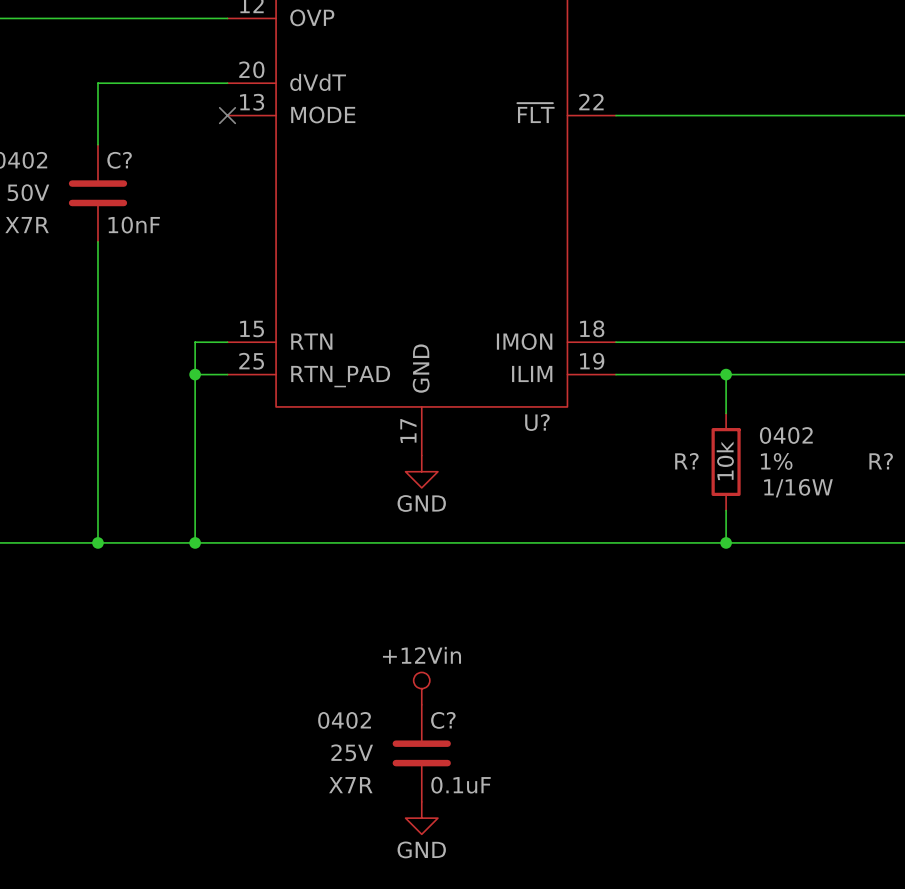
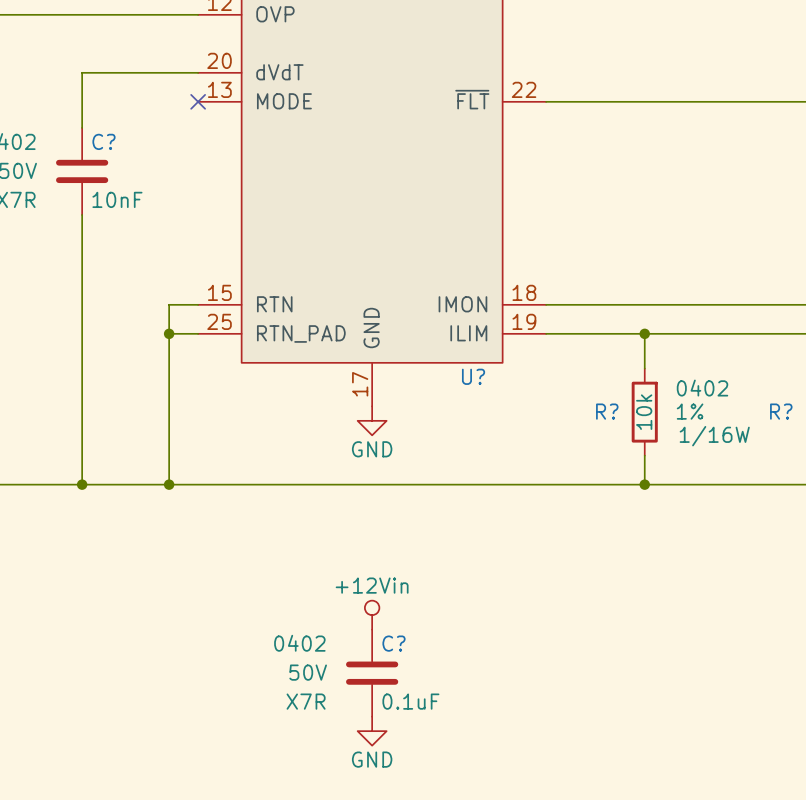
C? text: 25V (352, 752) -> 50V (308, 672)

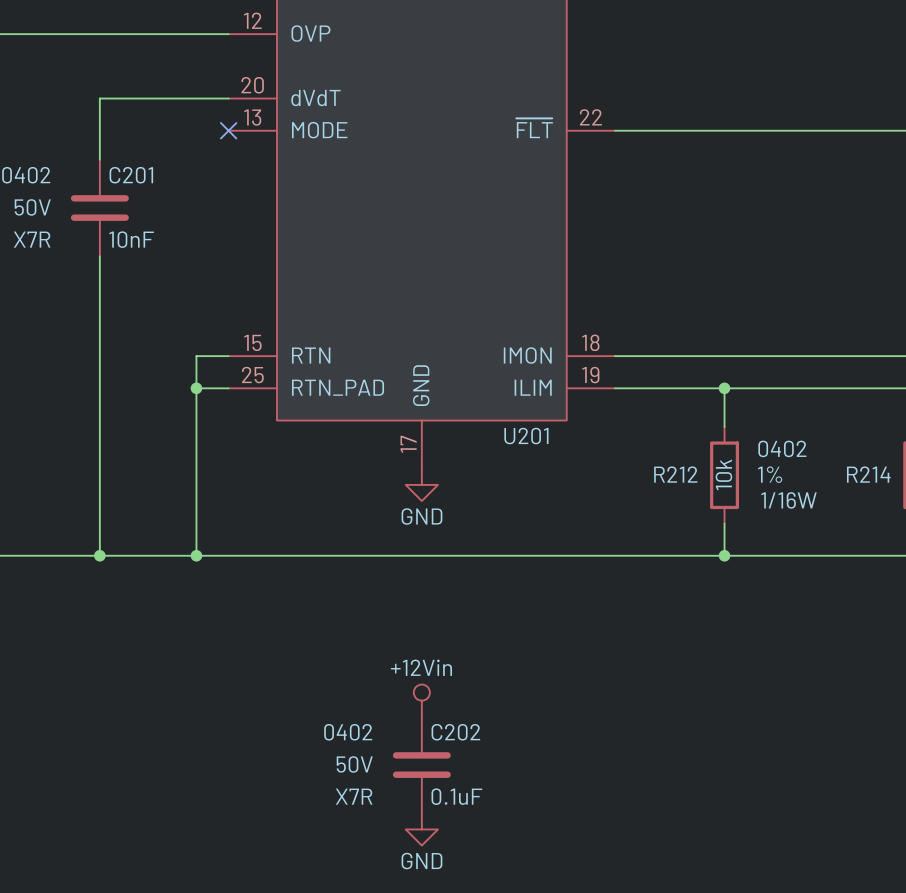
C? name: C? (103, 141) -> C201 (131, 175)
U? name: U? (473, 376) -> U201 (526, 436)
R? name: R? (607, 411) -> R212 (675, 474)
R? name: R? (781, 411) -> R214 (868, 474)
C? name: C? (393, 643) -> C202 (455, 732)

